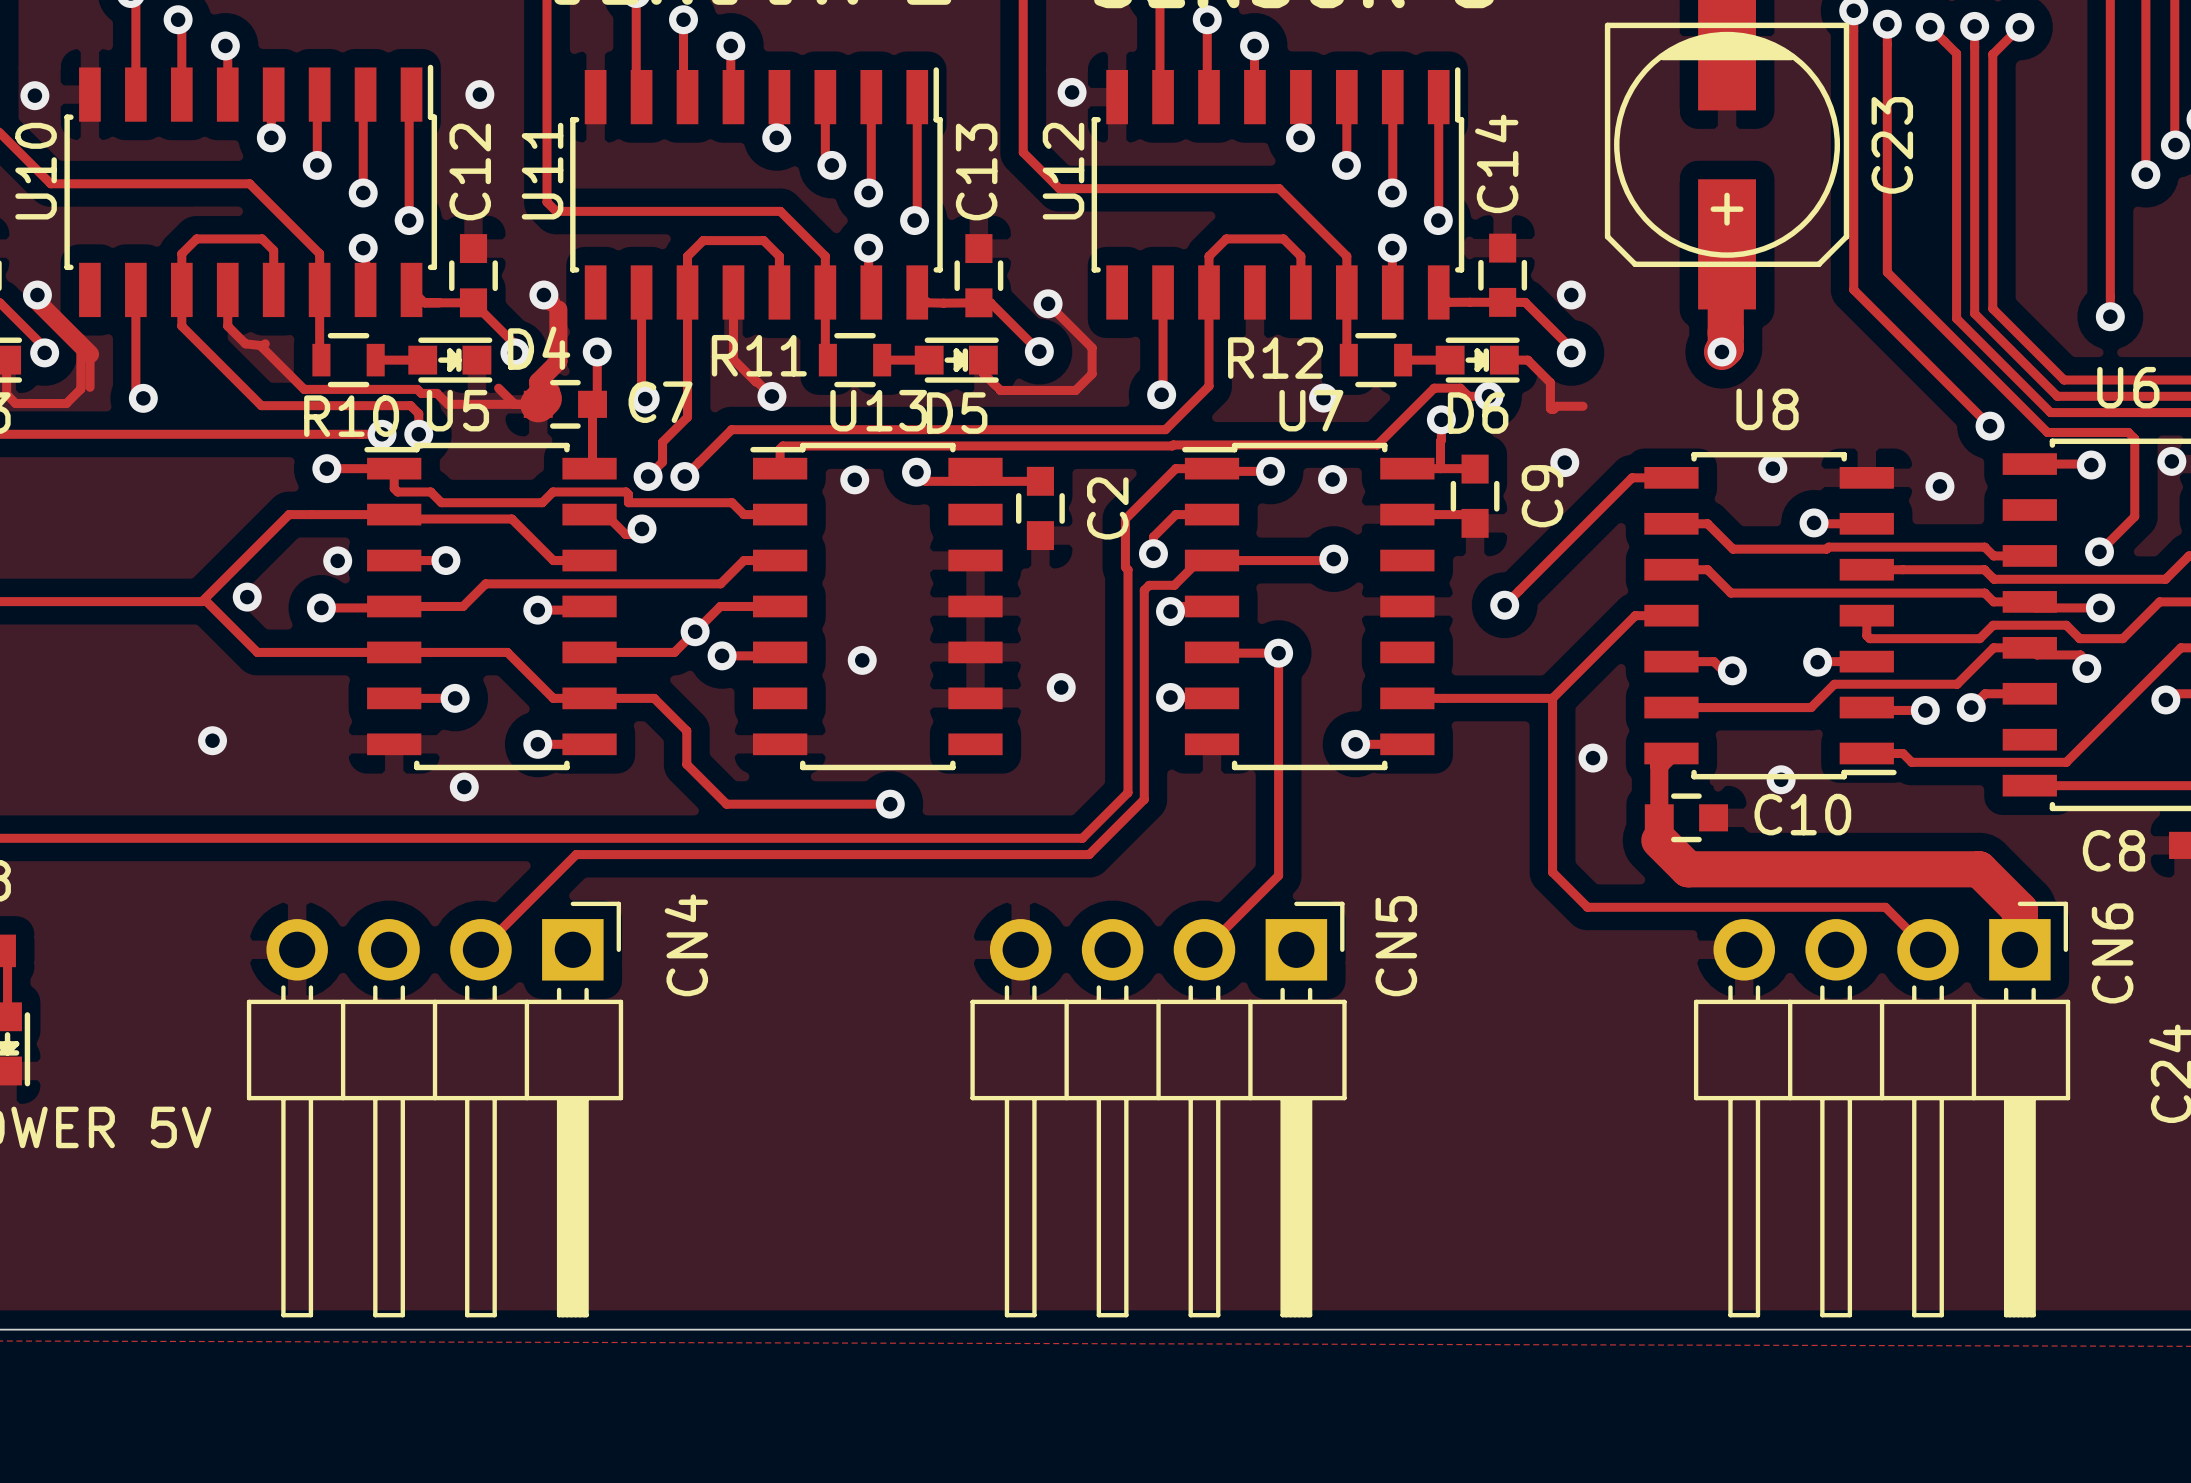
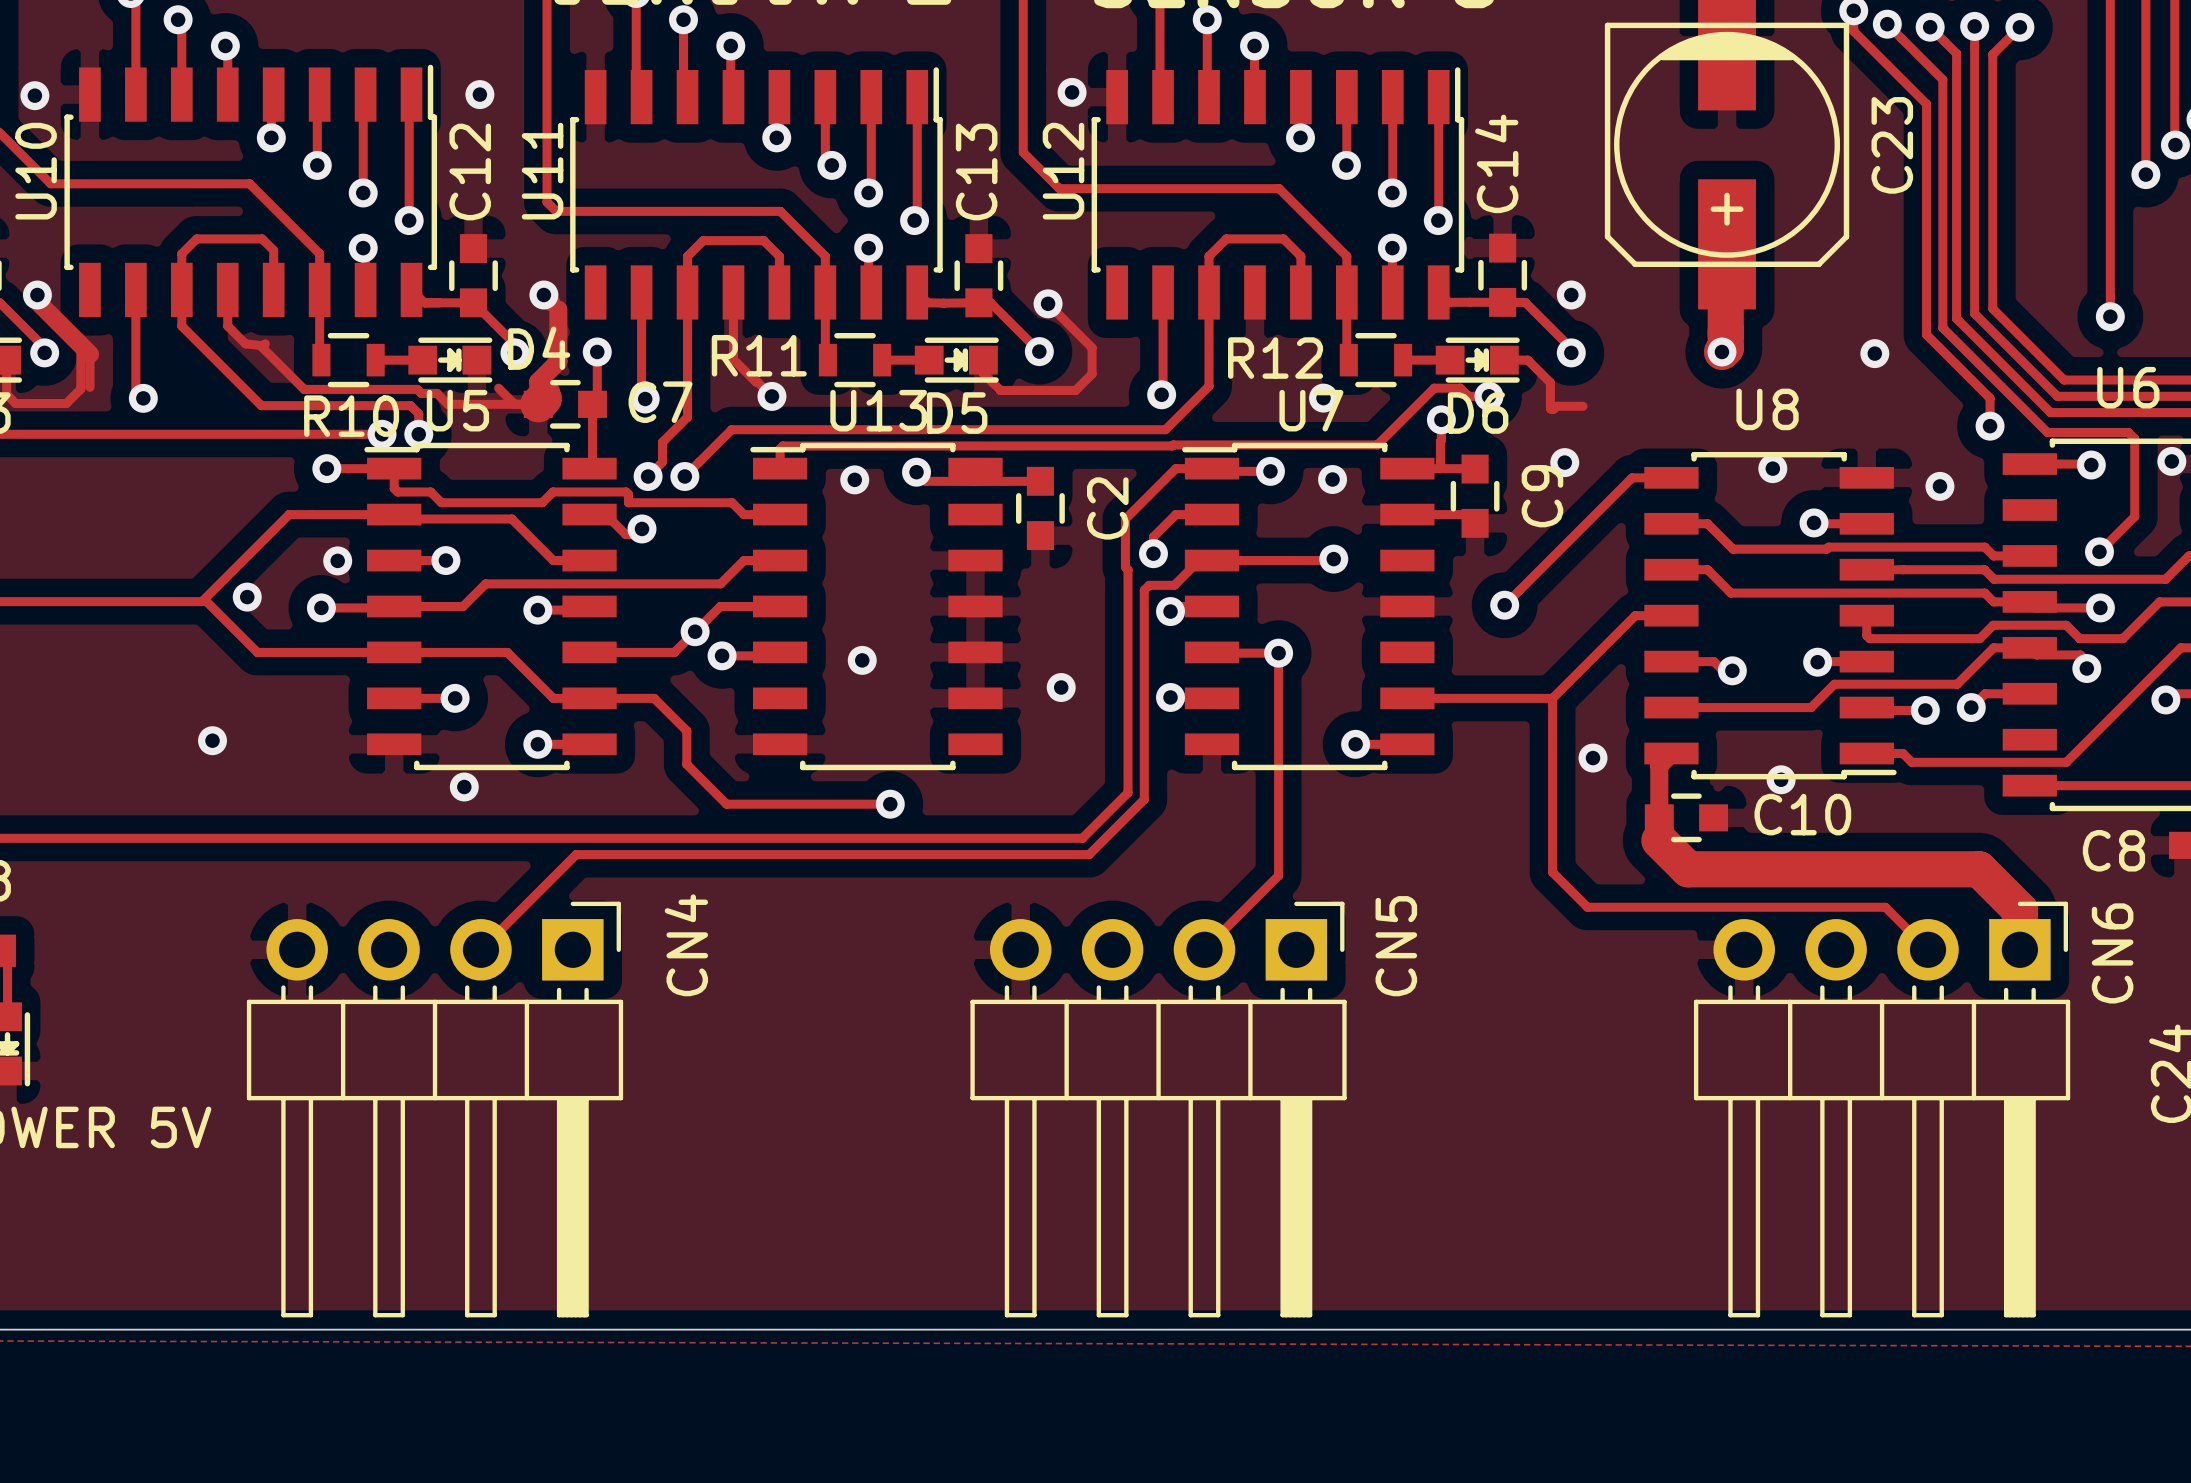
track: (1887, 24) (1887, 272) (1942, 327) -> (1887, 24) (1942, 79) (1942, 327)
track: (1853, 31) (1853, 289) (1990, 426) -> (1853, 31) (1926, 104) (1926, 334) (1990, 398) (1990, 426)
via: none -> (1874, 353)

